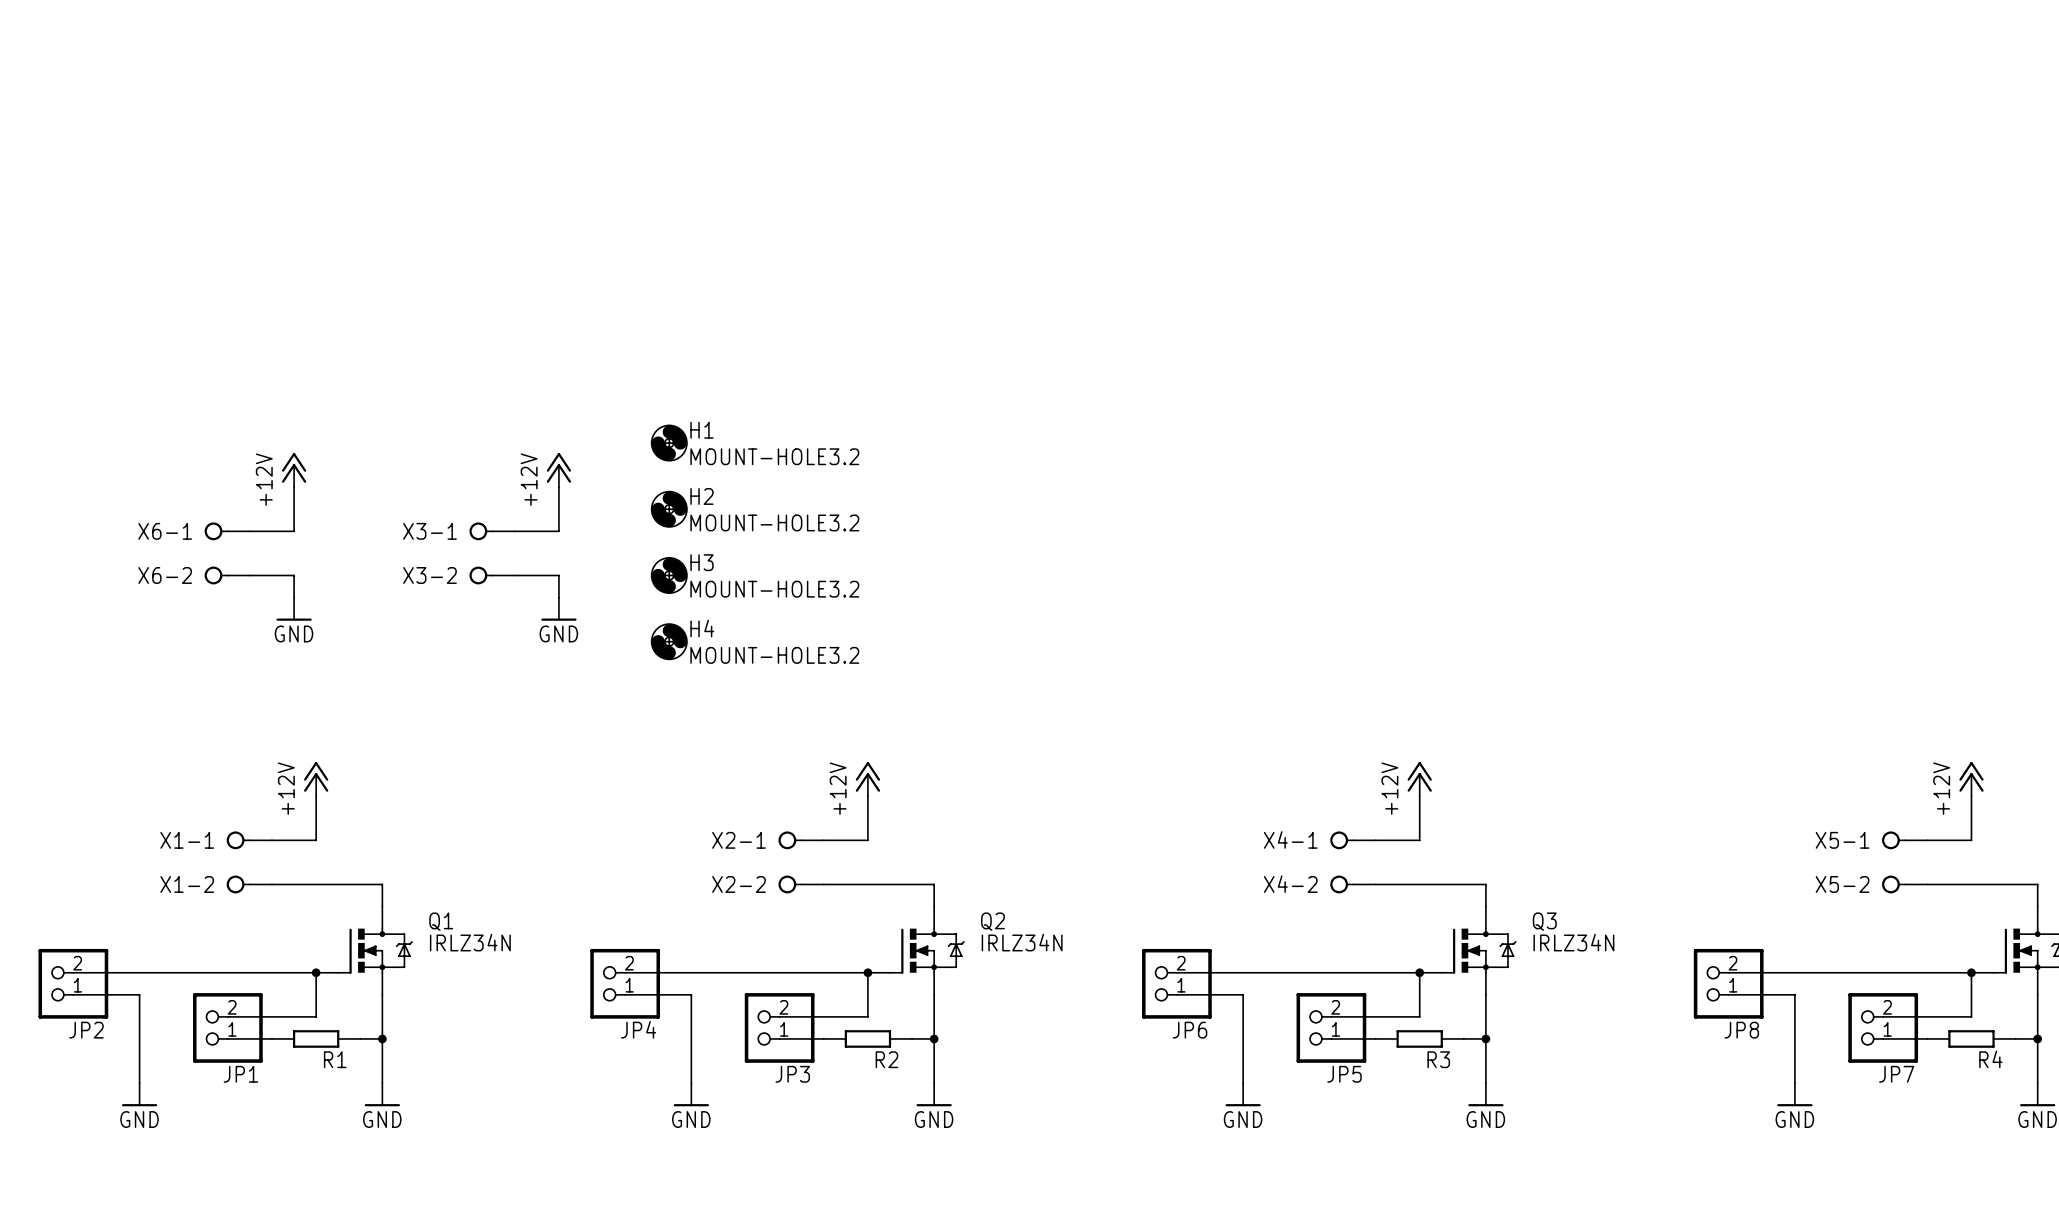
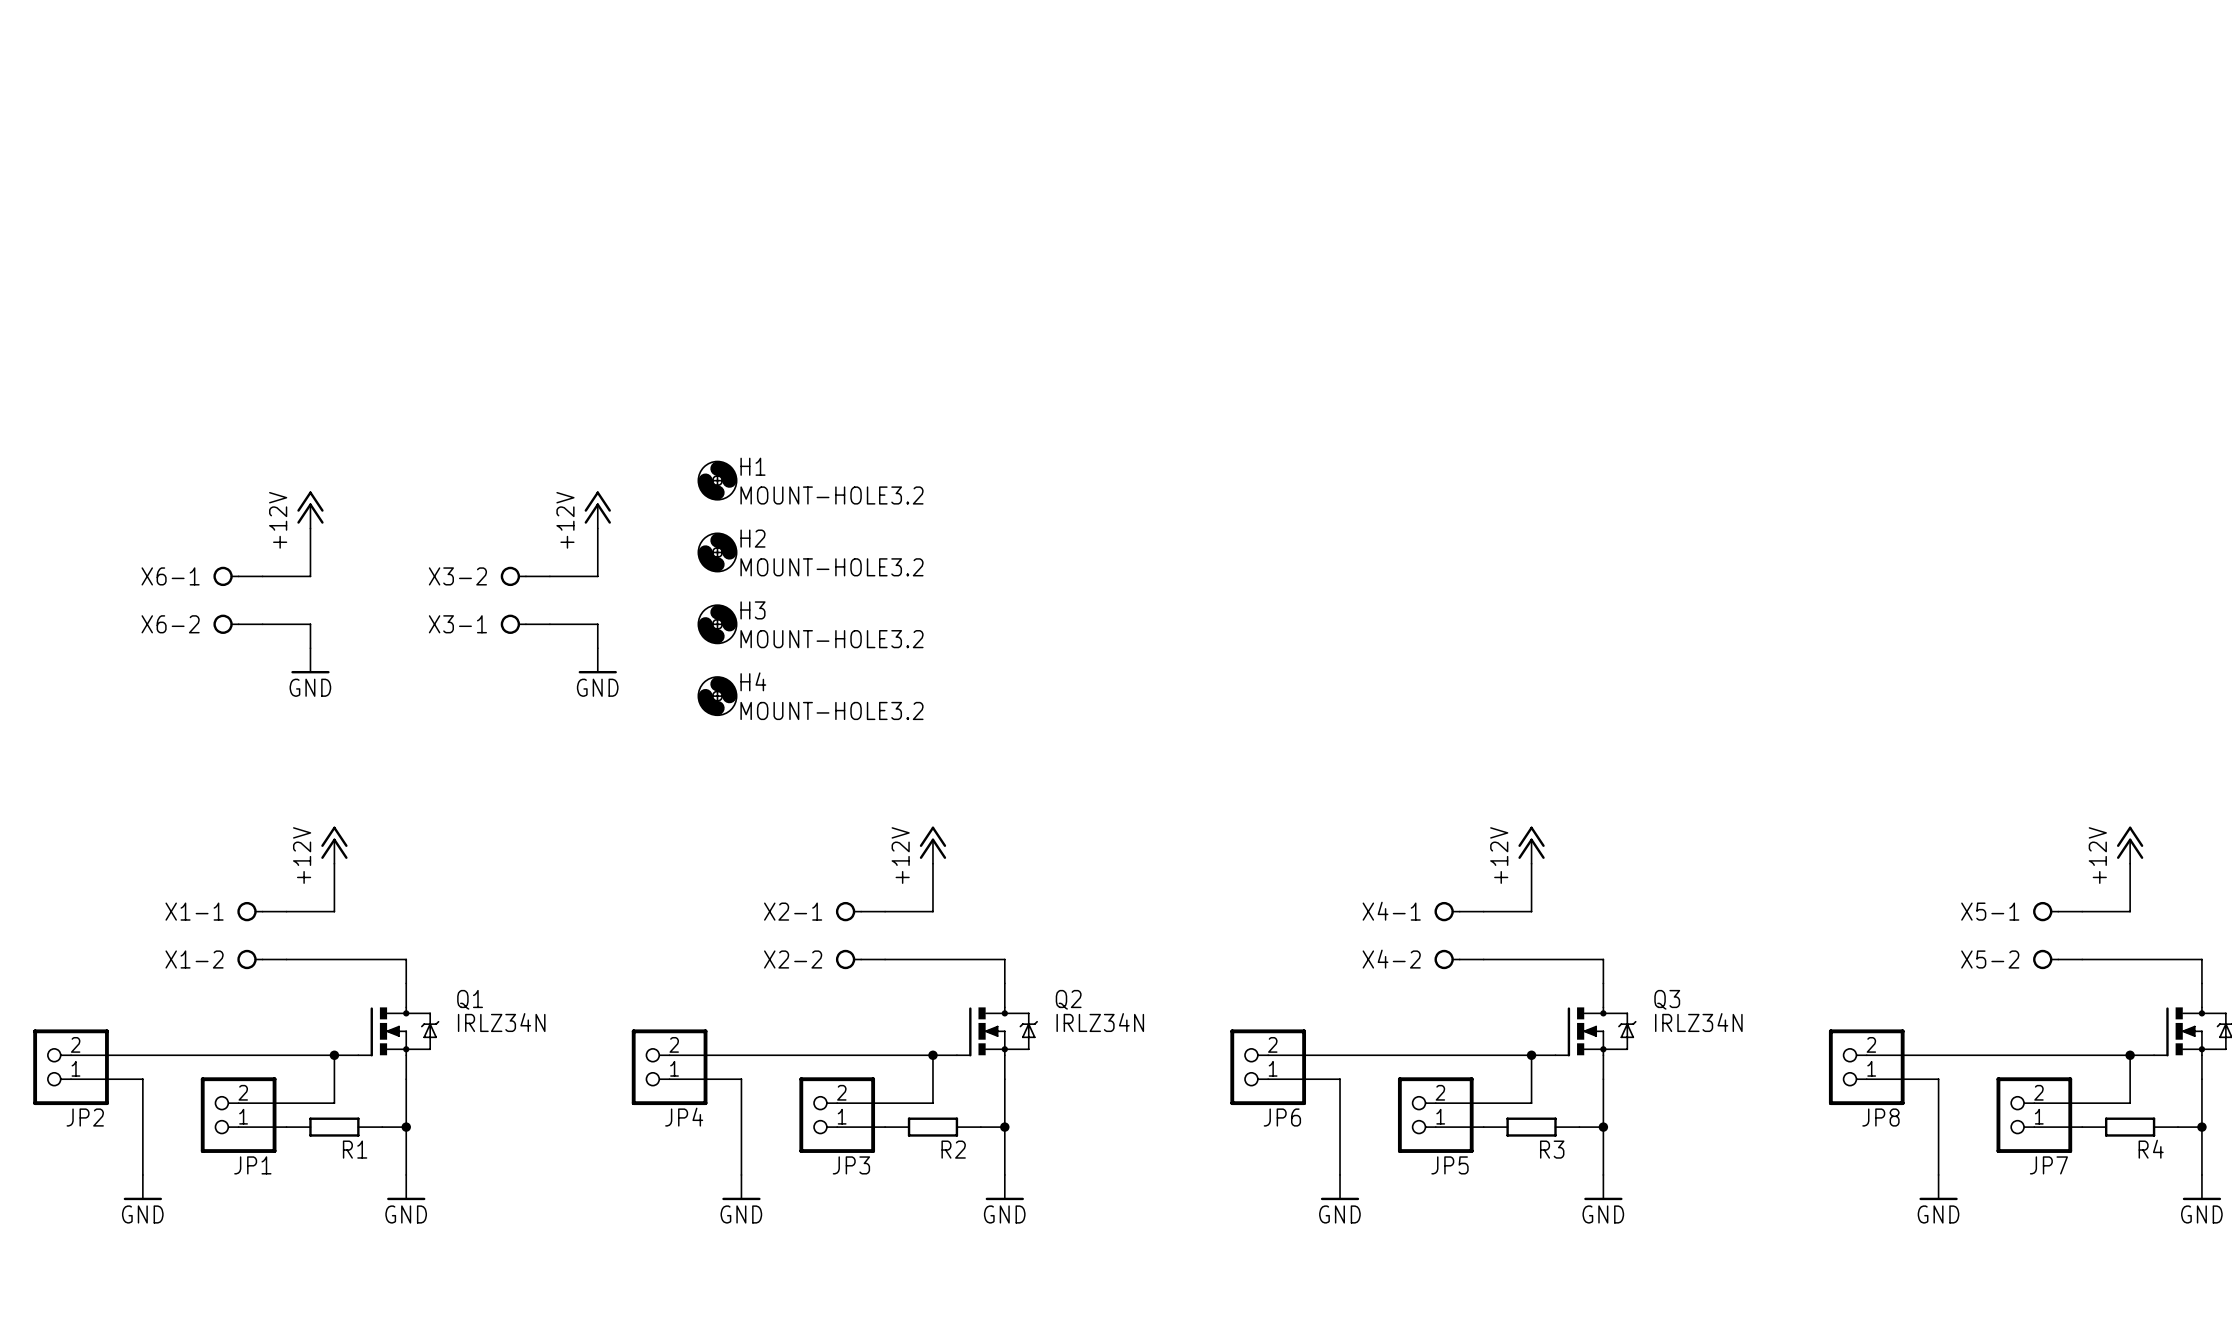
X3-1 name: X3-1 (430, 531) -> X3-2 (457, 576)
X3-2 name: X3-2 (430, 575) -> X3-1 (457, 624)

